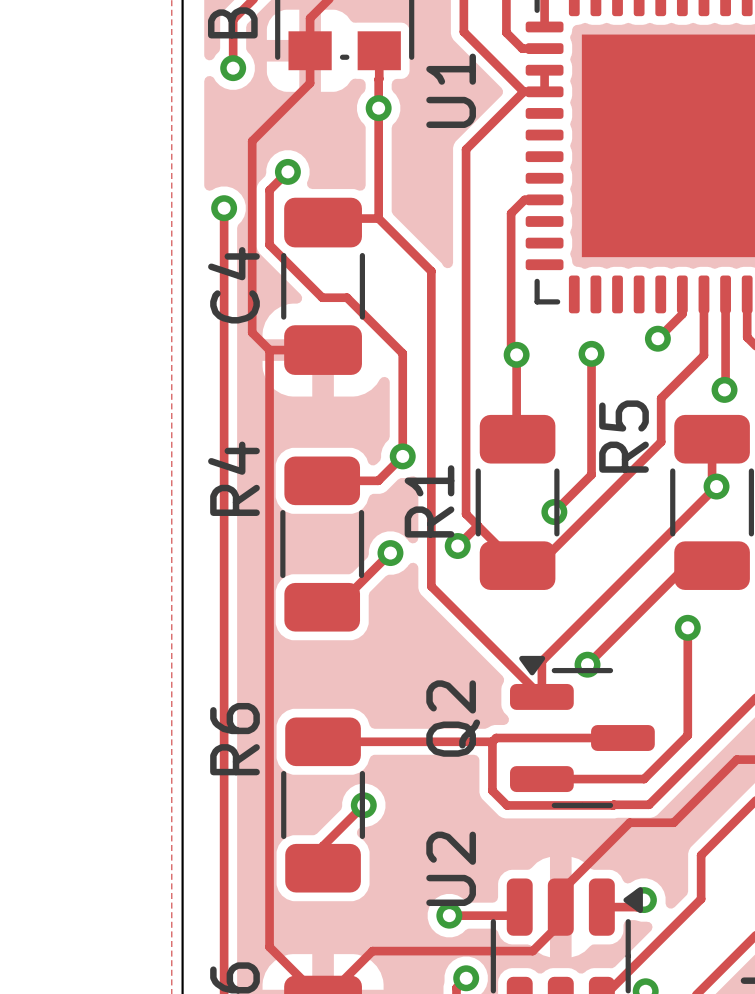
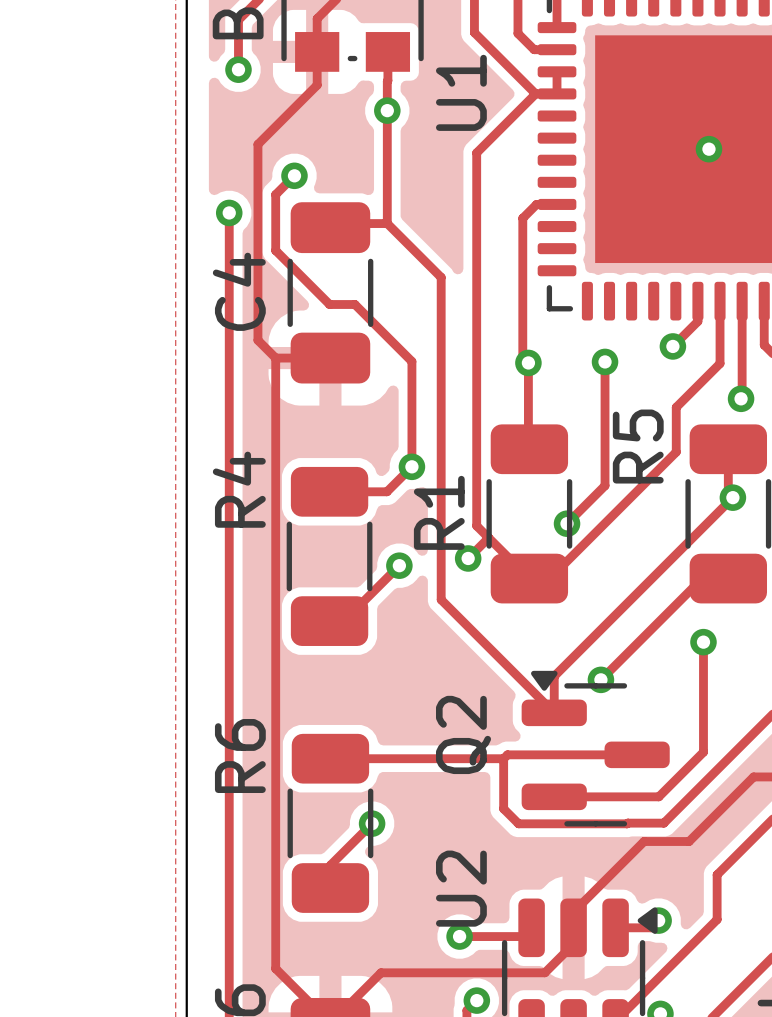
via: none -> (708, 149)

